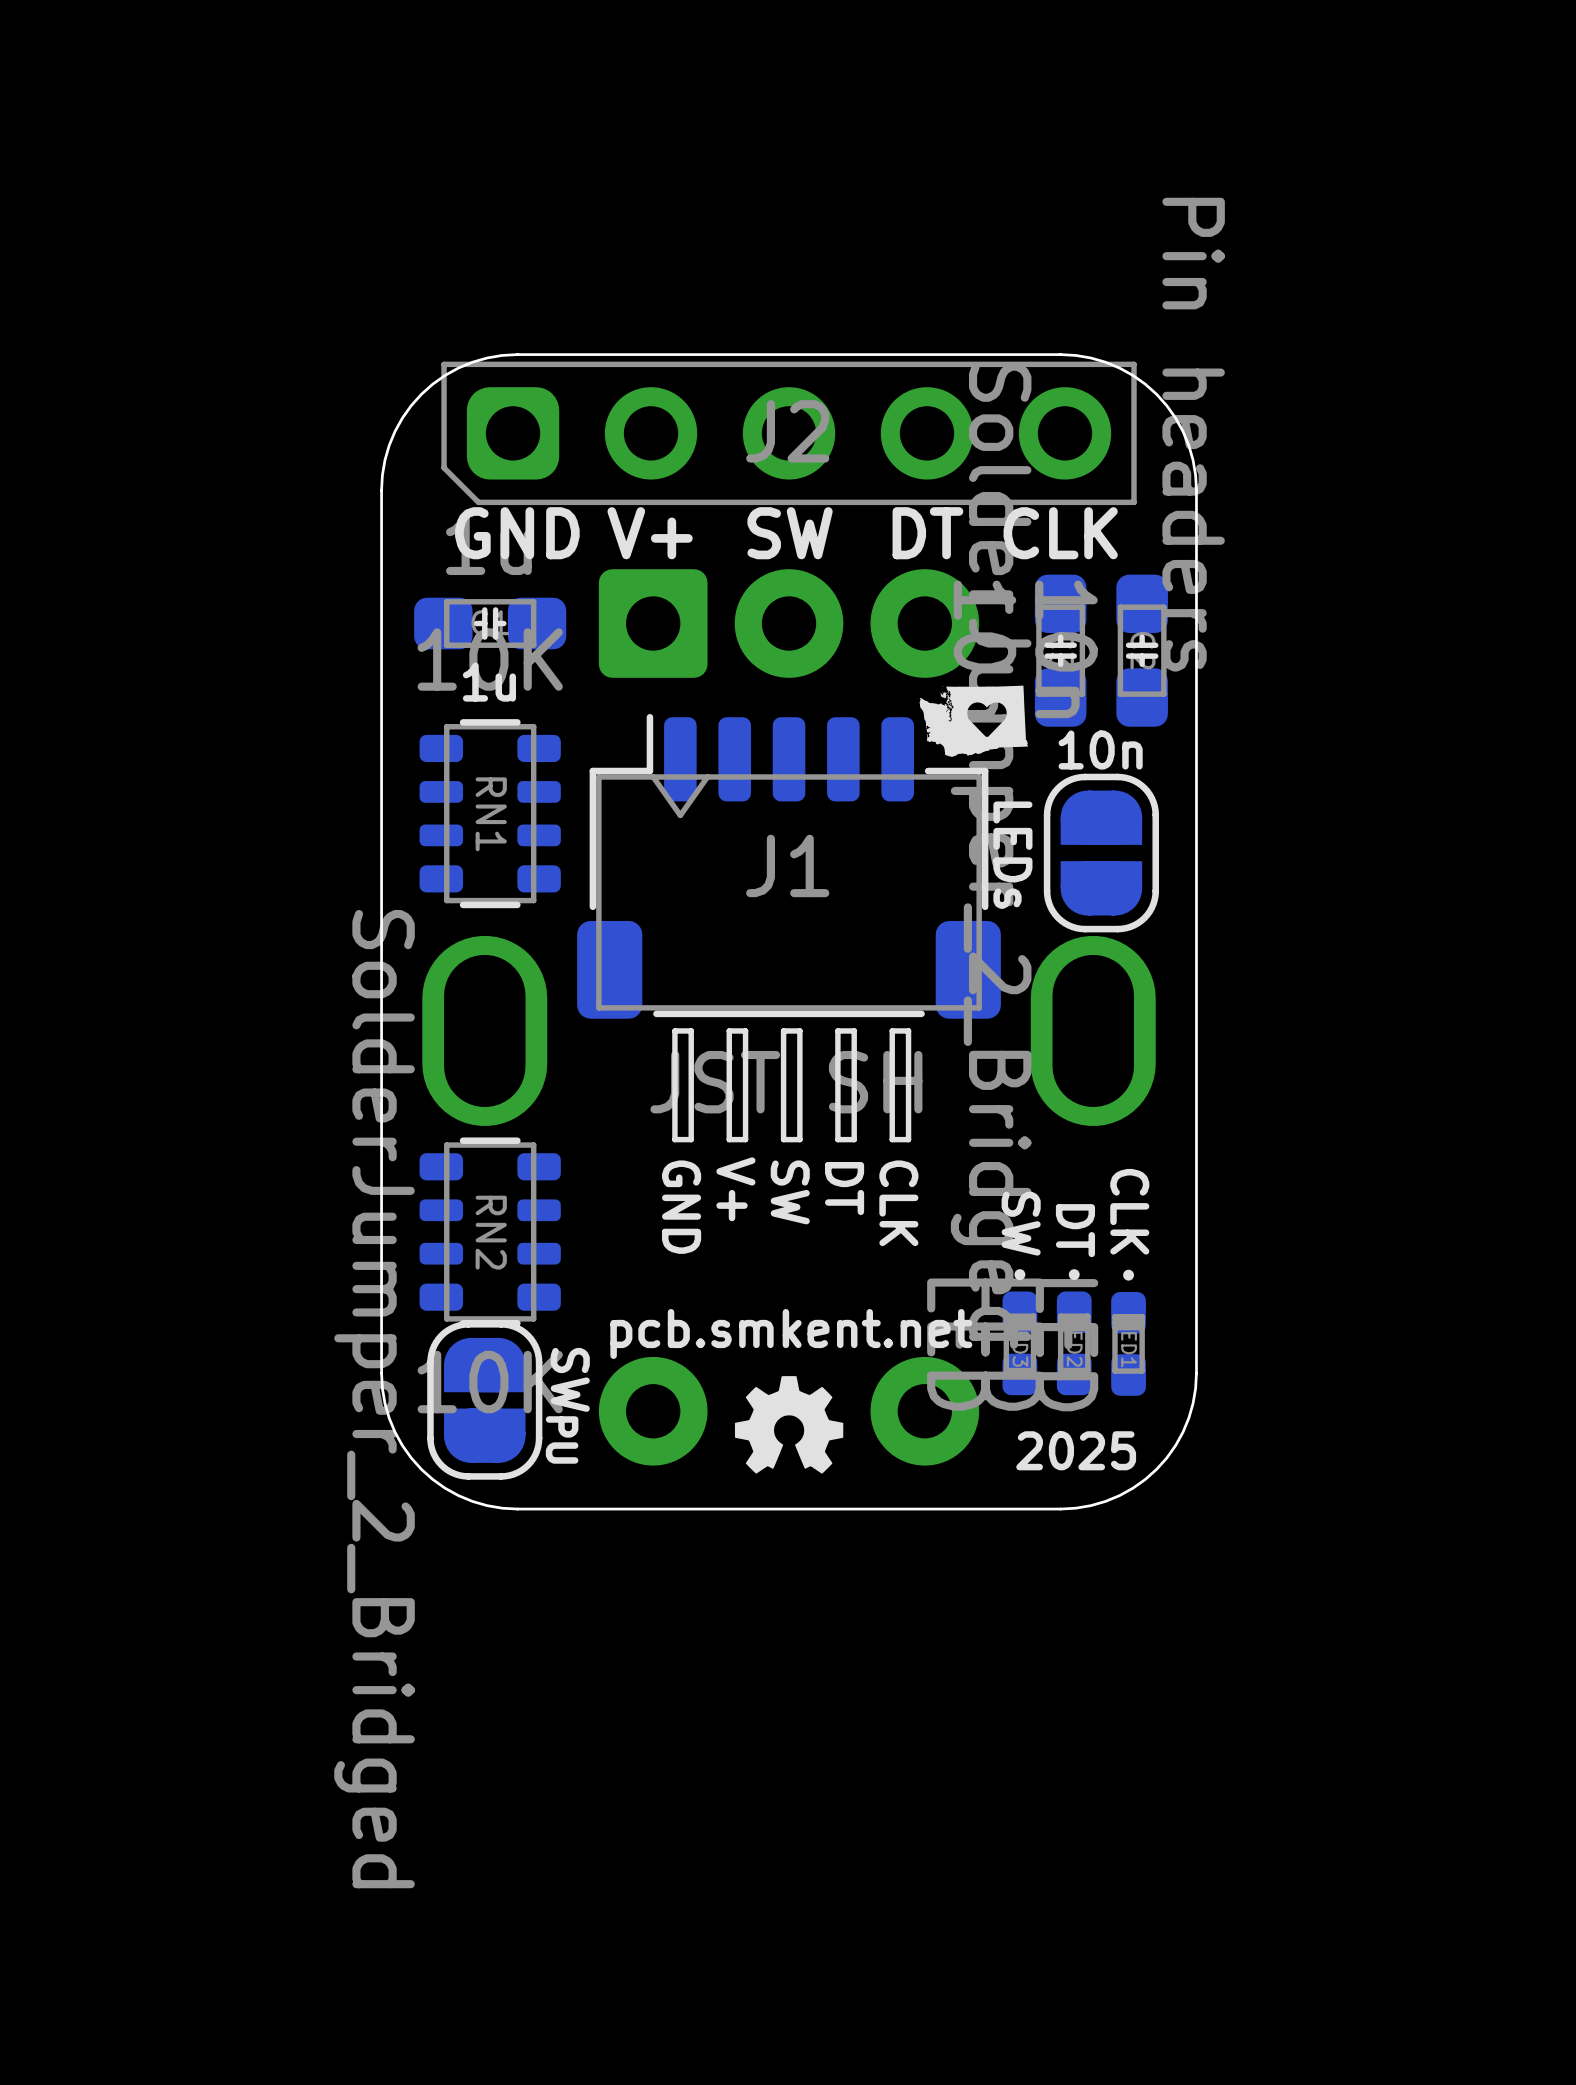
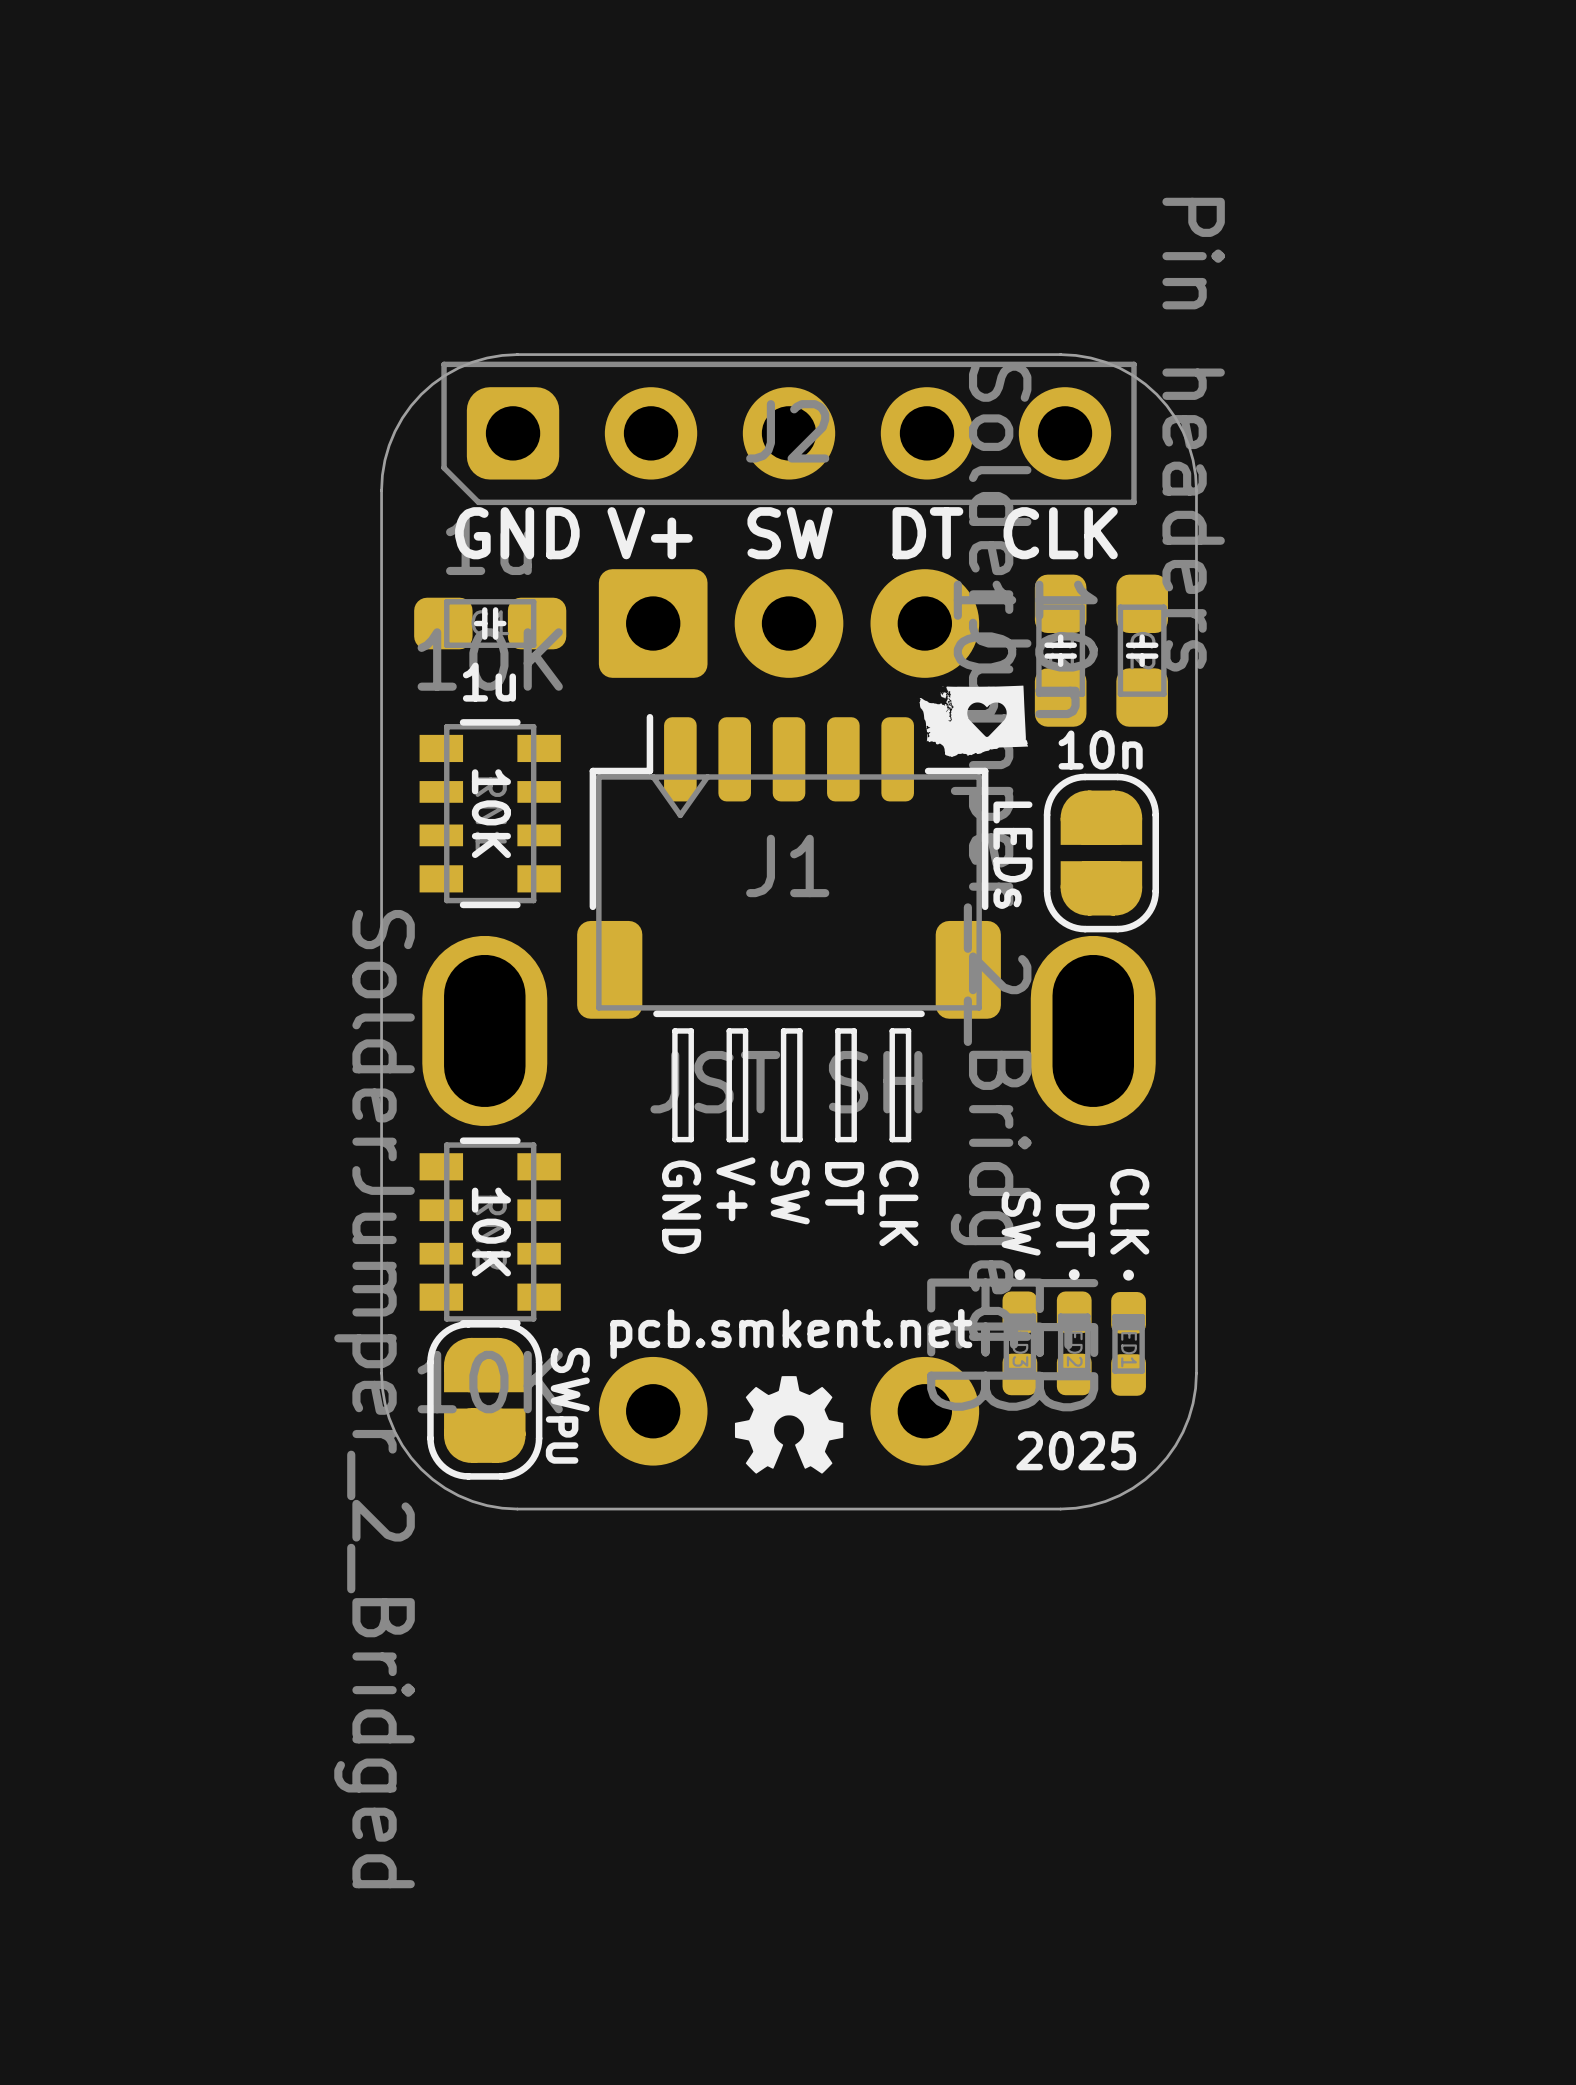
RN1 footprint: [419, 719, 561, 909] -> [419, 719, 561, 909]
text: none -> 10K (491, 813)
RN2 footprint: [419, 1137, 561, 1327] -> [419, 1137, 561, 1327]
text: none -> 10K (491, 1231)

